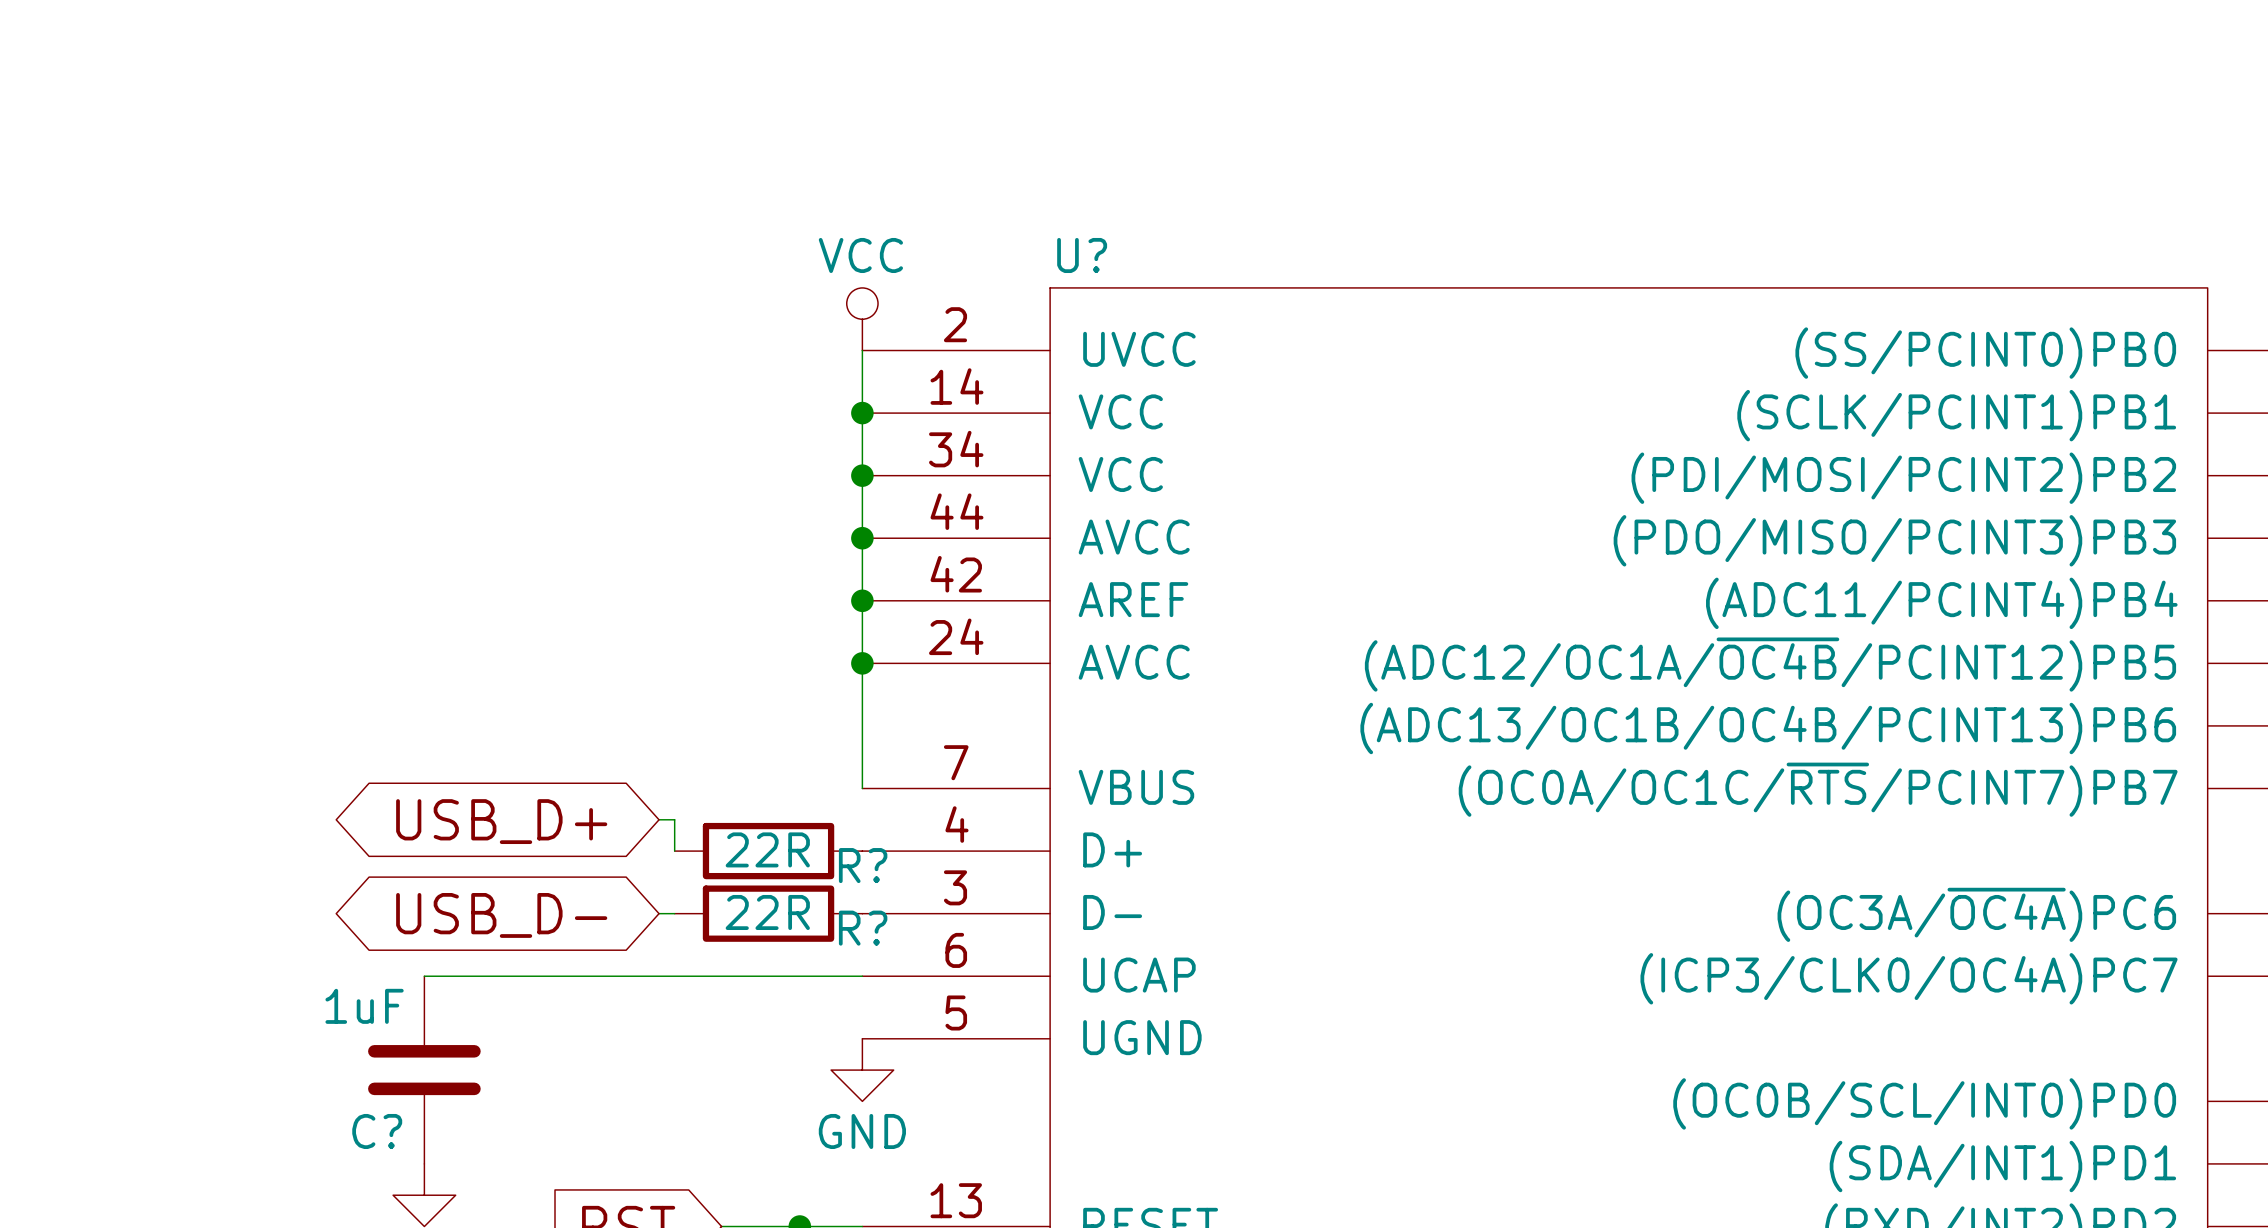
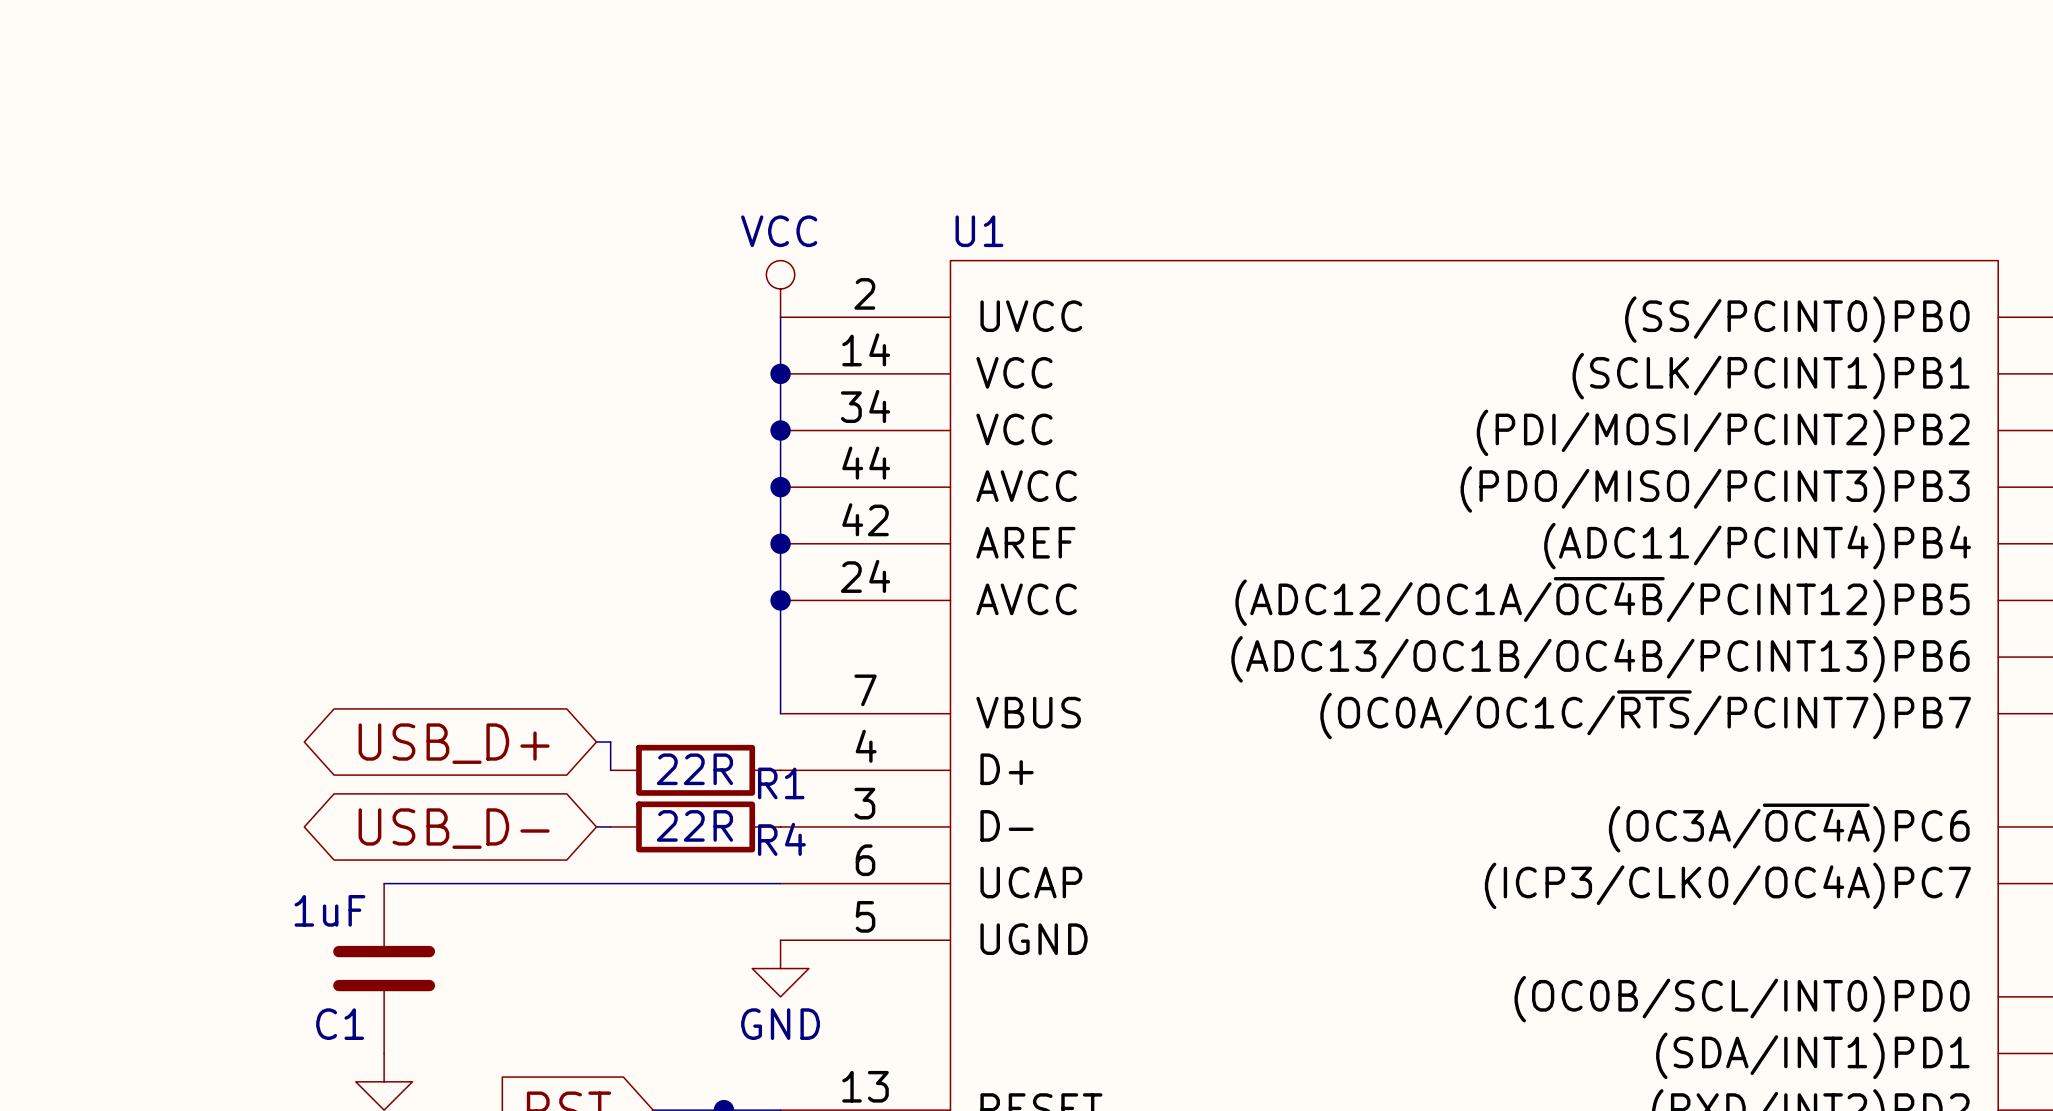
U? name: U? (1082, 255) -> U1 (979, 231)
R? name: R? (863, 865) -> R1 (781, 783)
R? name: R? (863, 928) -> R4 (781, 839)
C? name: C? (377, 1131) -> C1 (340, 1024)

